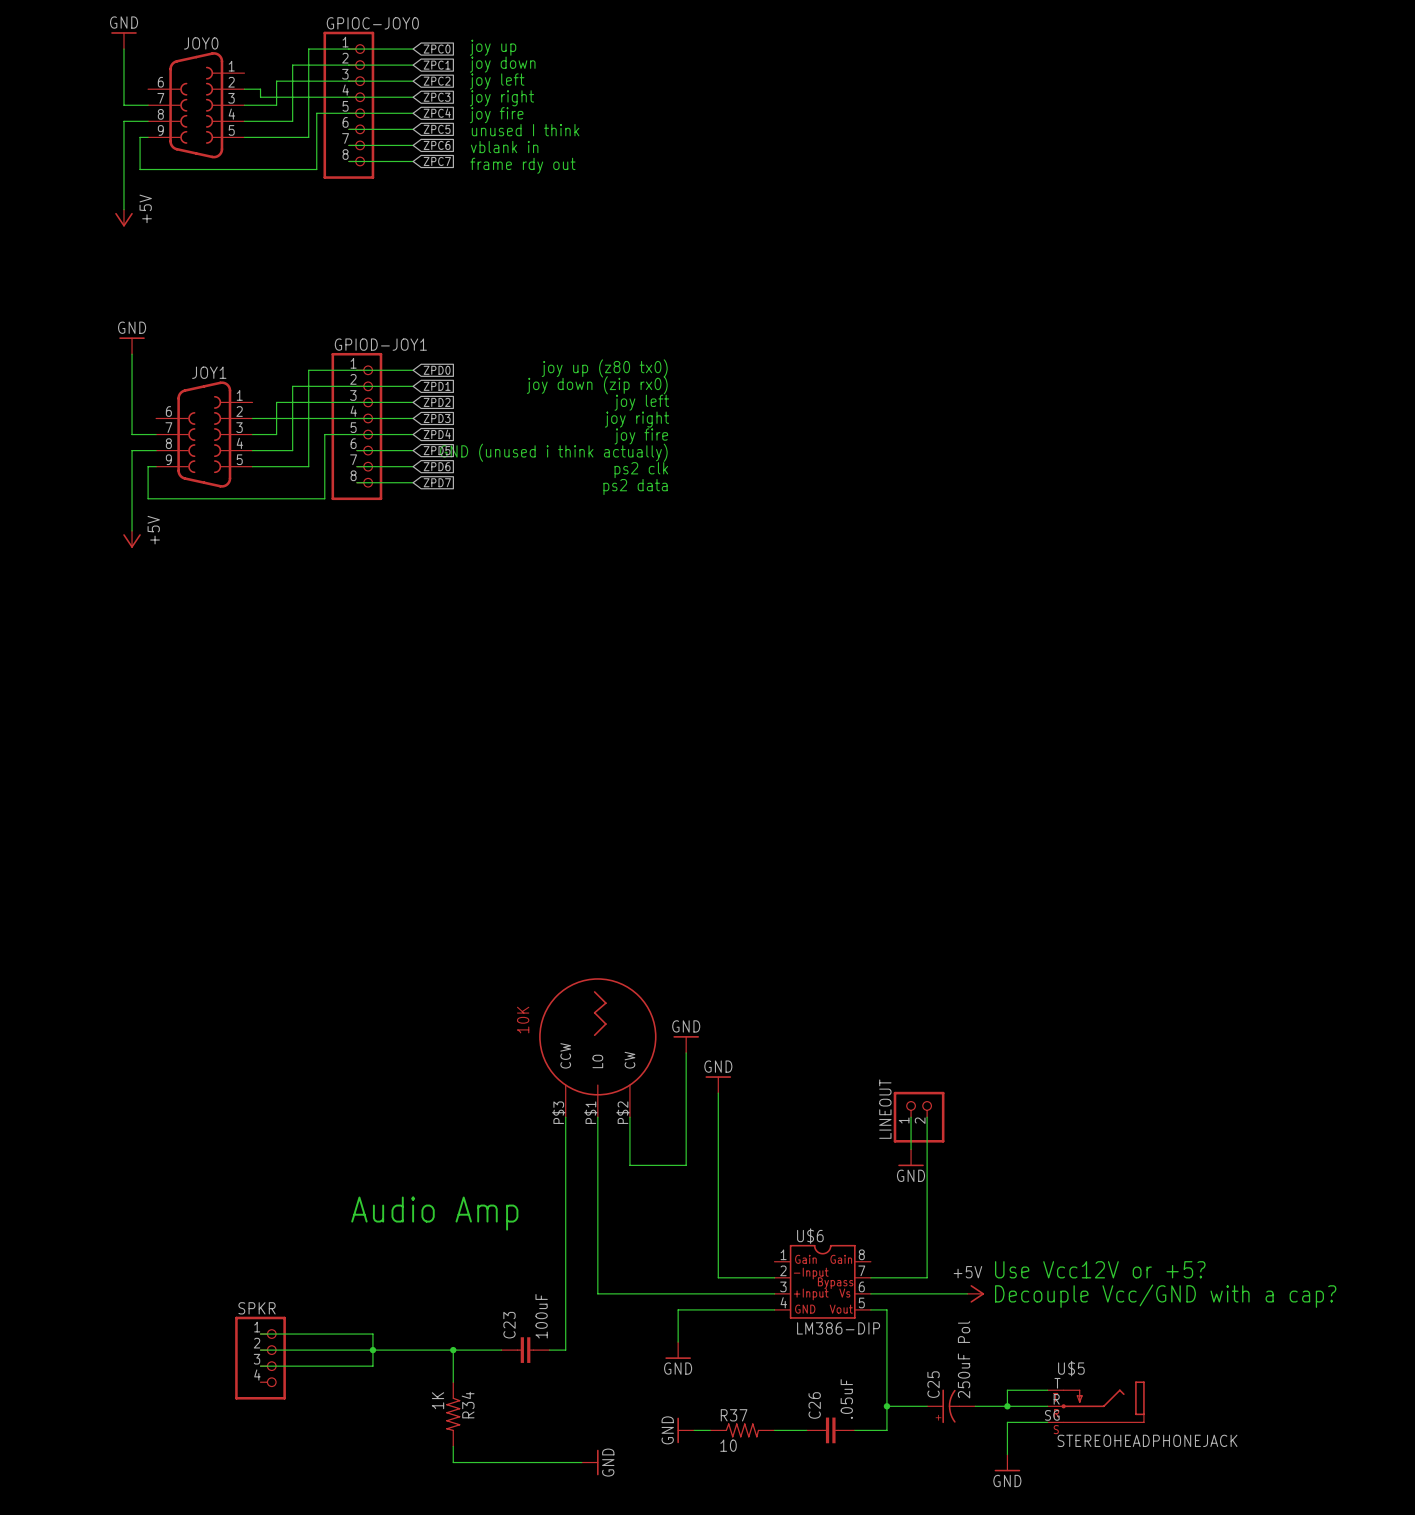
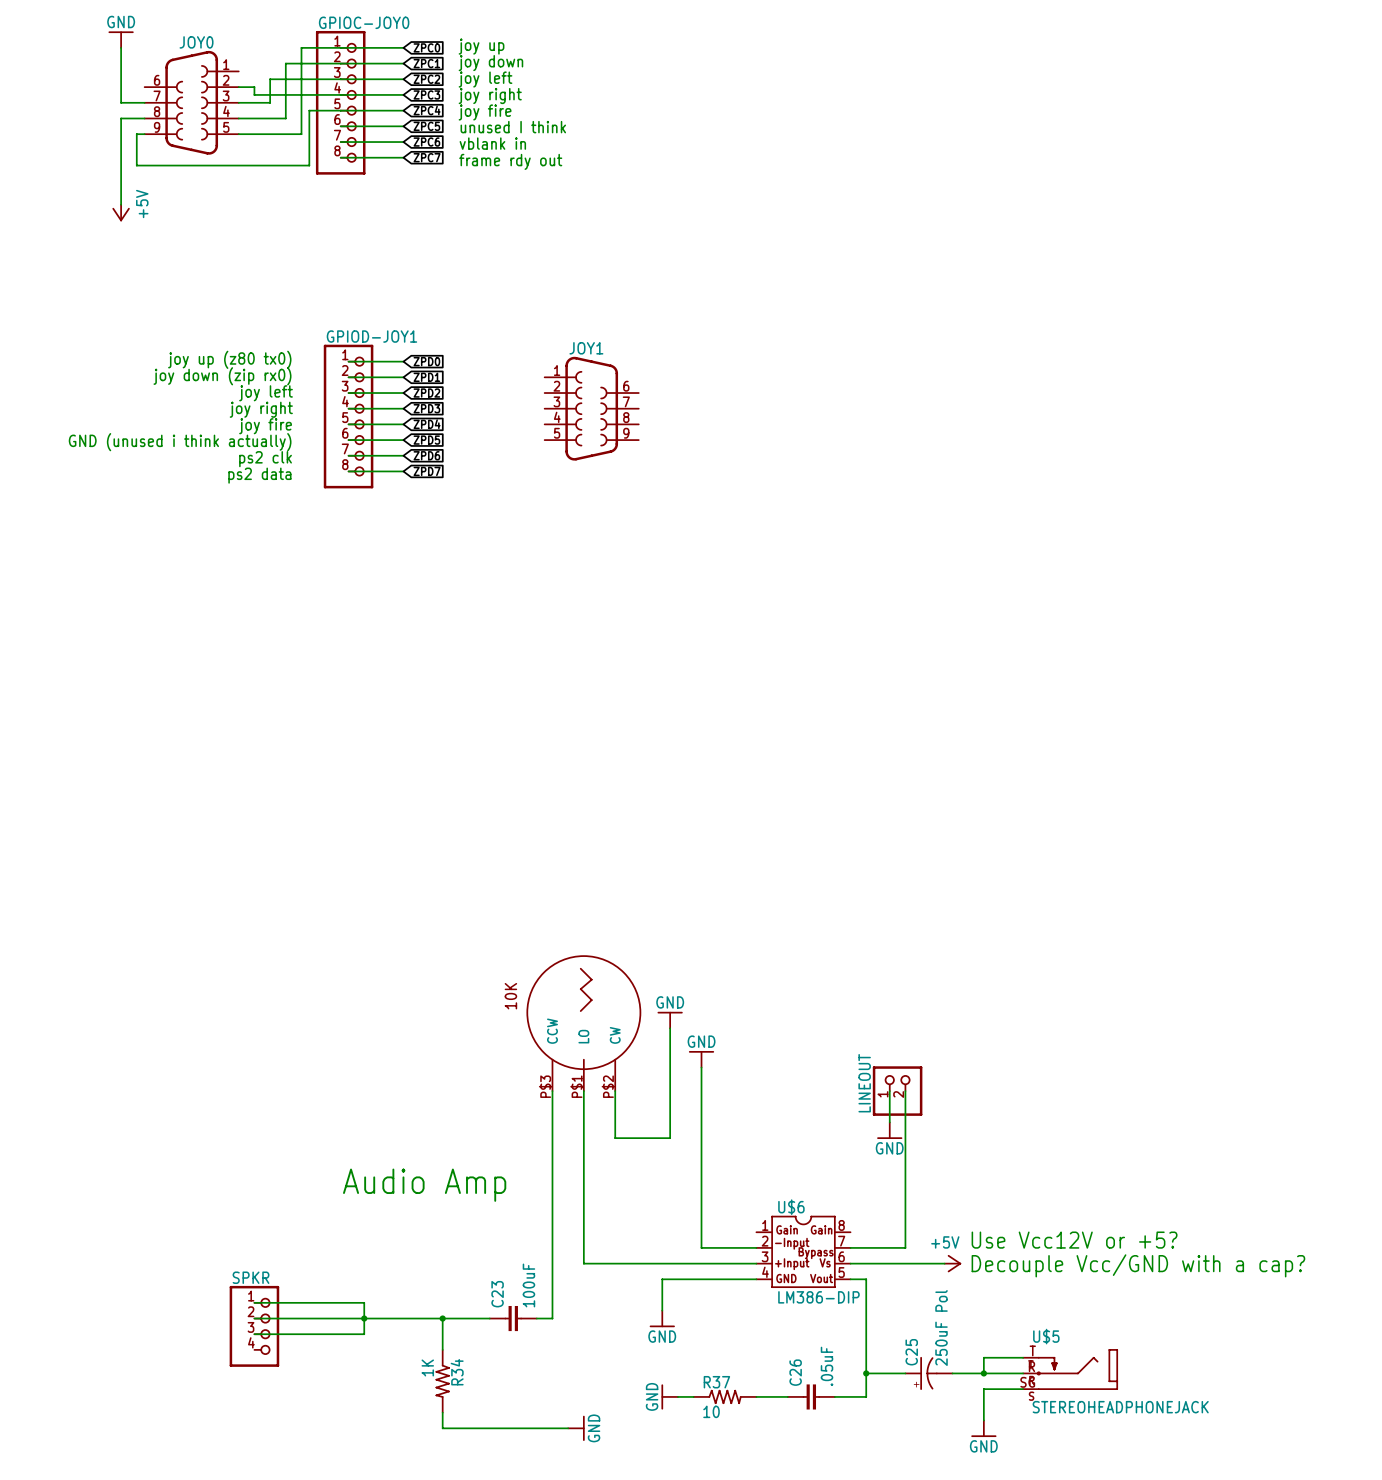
power symbol: GND (132, 345) -> none
wire: (132, 354) (132, 434) (156, 434) -> none
text: none -> joy up (z80 tx0) (229, 359)
text: joy up (z80 tx0) (604, 368) -> none
wire: (356, 370) (308, 370) (308, 466) (252, 466) -> none
text: none -> joy down (zip rx0) (222, 376)
text: joy down (zip rx0) (597, 385) -> none
wire: (356, 386) (292, 386) (292, 450) (252, 450) -> none
text: none -> joy left (266, 393)
wire: (356, 402) (276, 402) (276, 434) (252, 434) -> none
text: joy left (641, 402) -> none
wire: (252, 418) (356, 418) -> none
text: none -> joy right (261, 409)
text: joy right (636, 419) -> none
JOY1 flip: as is (204, 434) -> left-right (591, 408)
JOY1 position: (204, 434) -> (591, 408)
wire: (356, 434) (324, 434) (324, 498) (148, 498) (148, 466) (156, 466) -> none
text: none -> joy fire (265, 426)
text: joy fire (641, 436) -> none
wire: (156, 450) (132, 450) (132, 530) -> none
text: none -> GND (unused i think actually) (180, 442)
text: GND (unused i think actually) (553, 452) -> none
text: none -> ps2 clk (265, 459)
text: ps2 clk (641, 470) -> none
text: none -> ps2 data (259, 475)
text: ps2 data (635, 487) -> none
power symbol: +5V (132, 539) -> none

